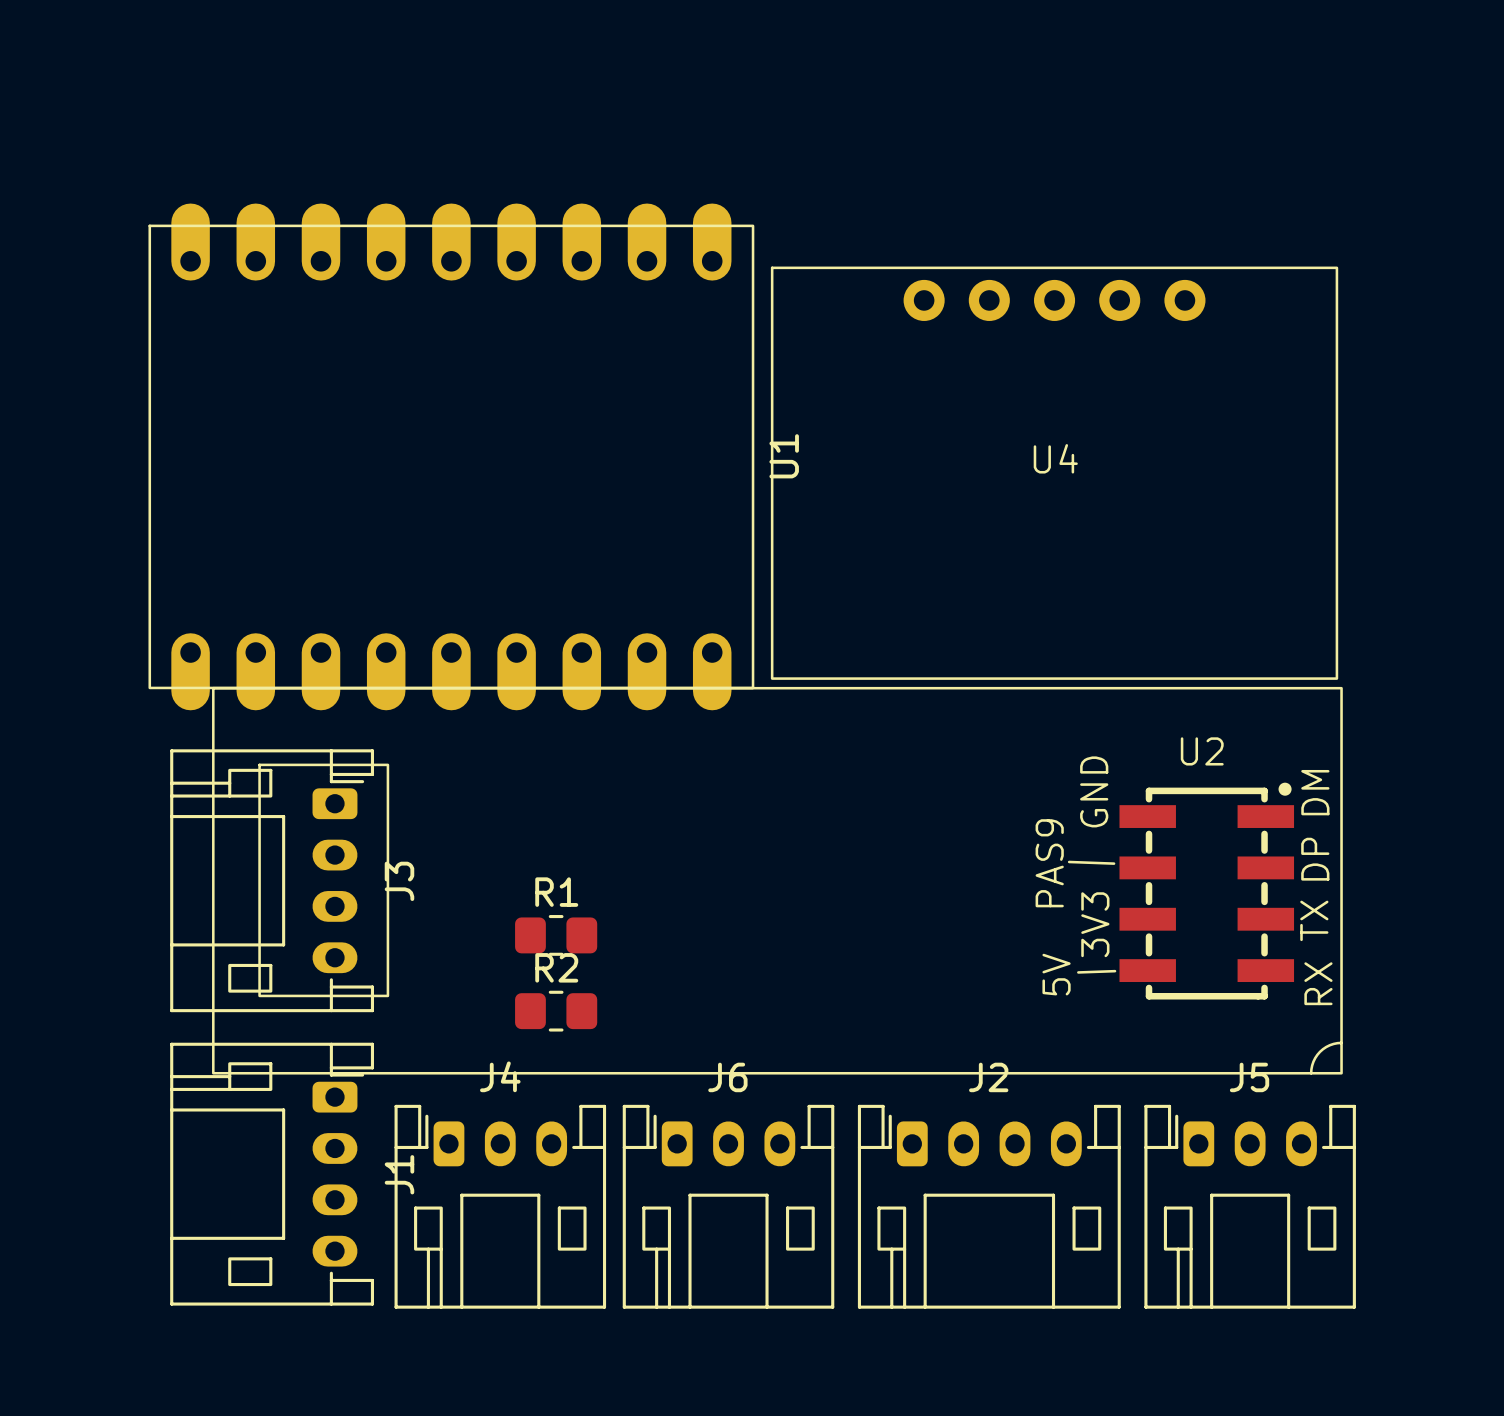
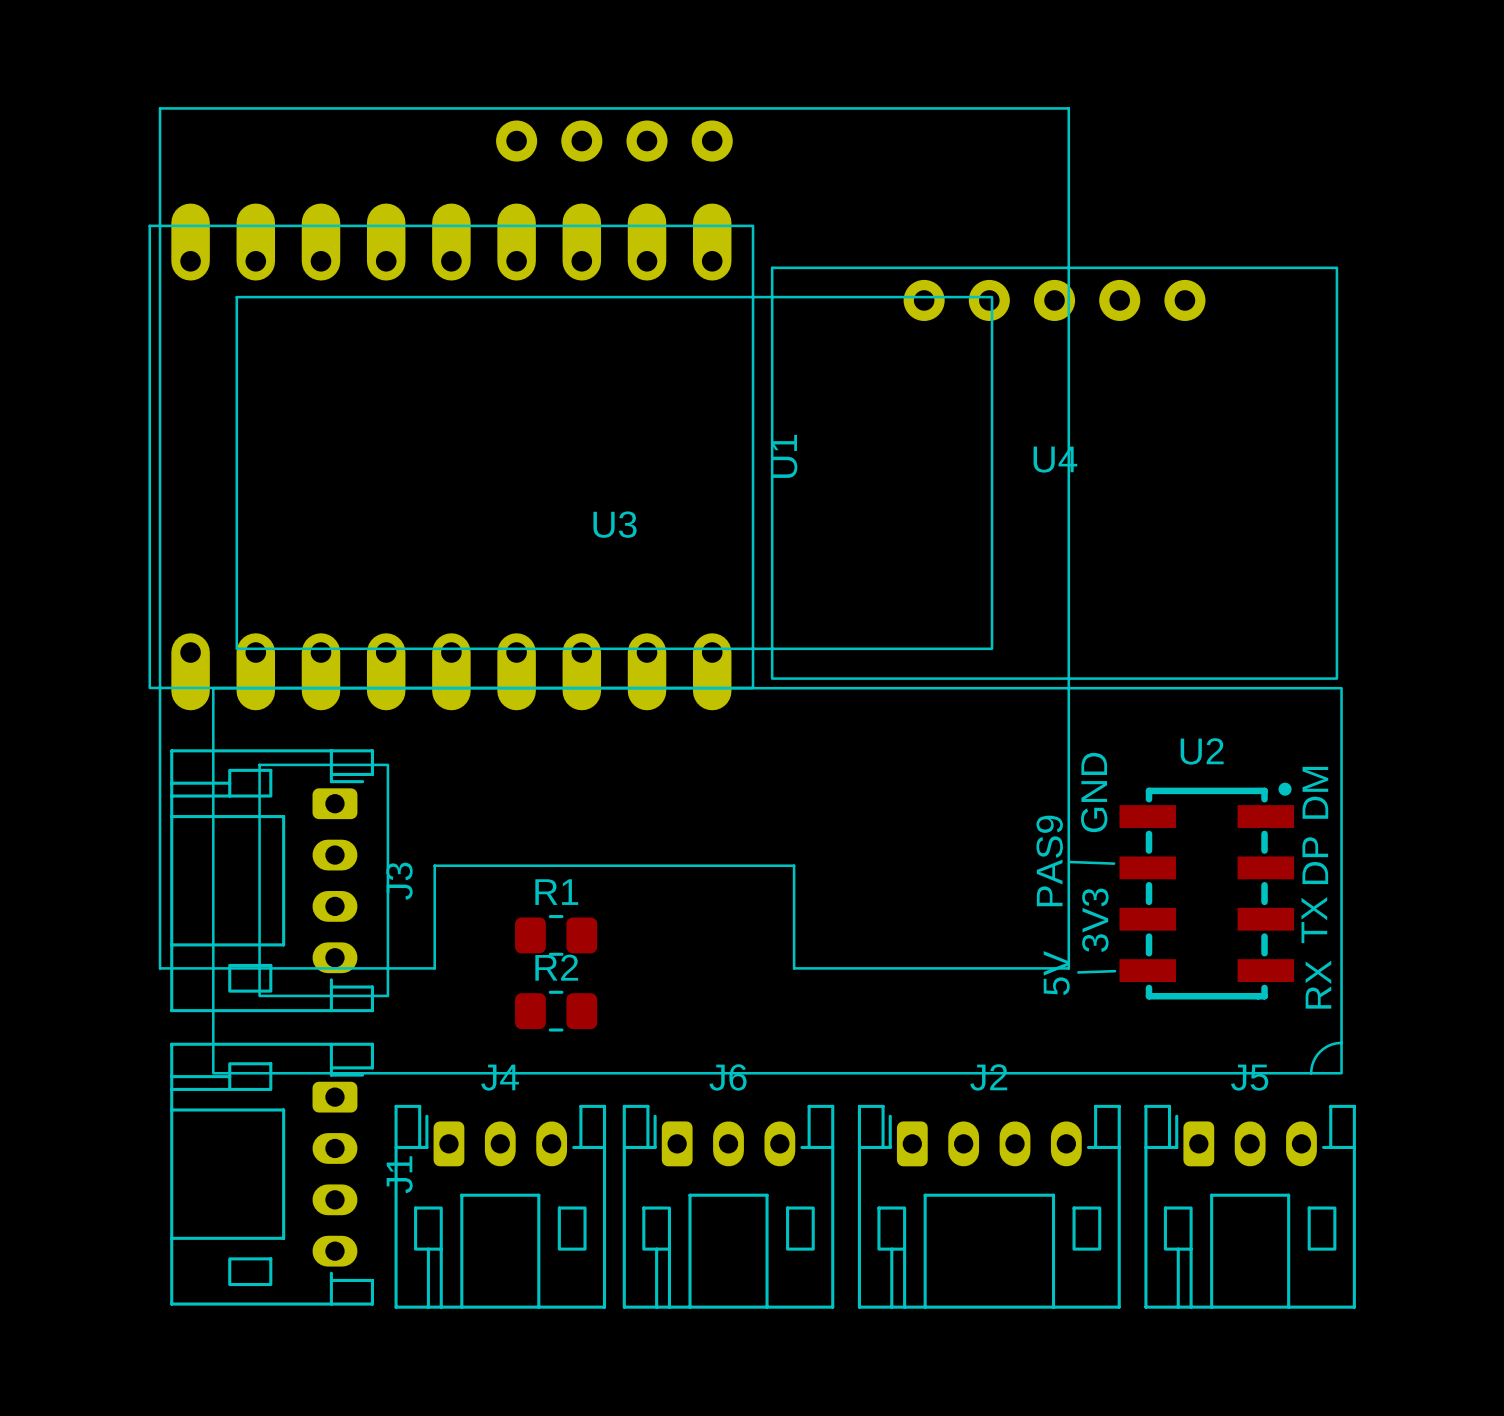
U3: none -> (614, 538)

